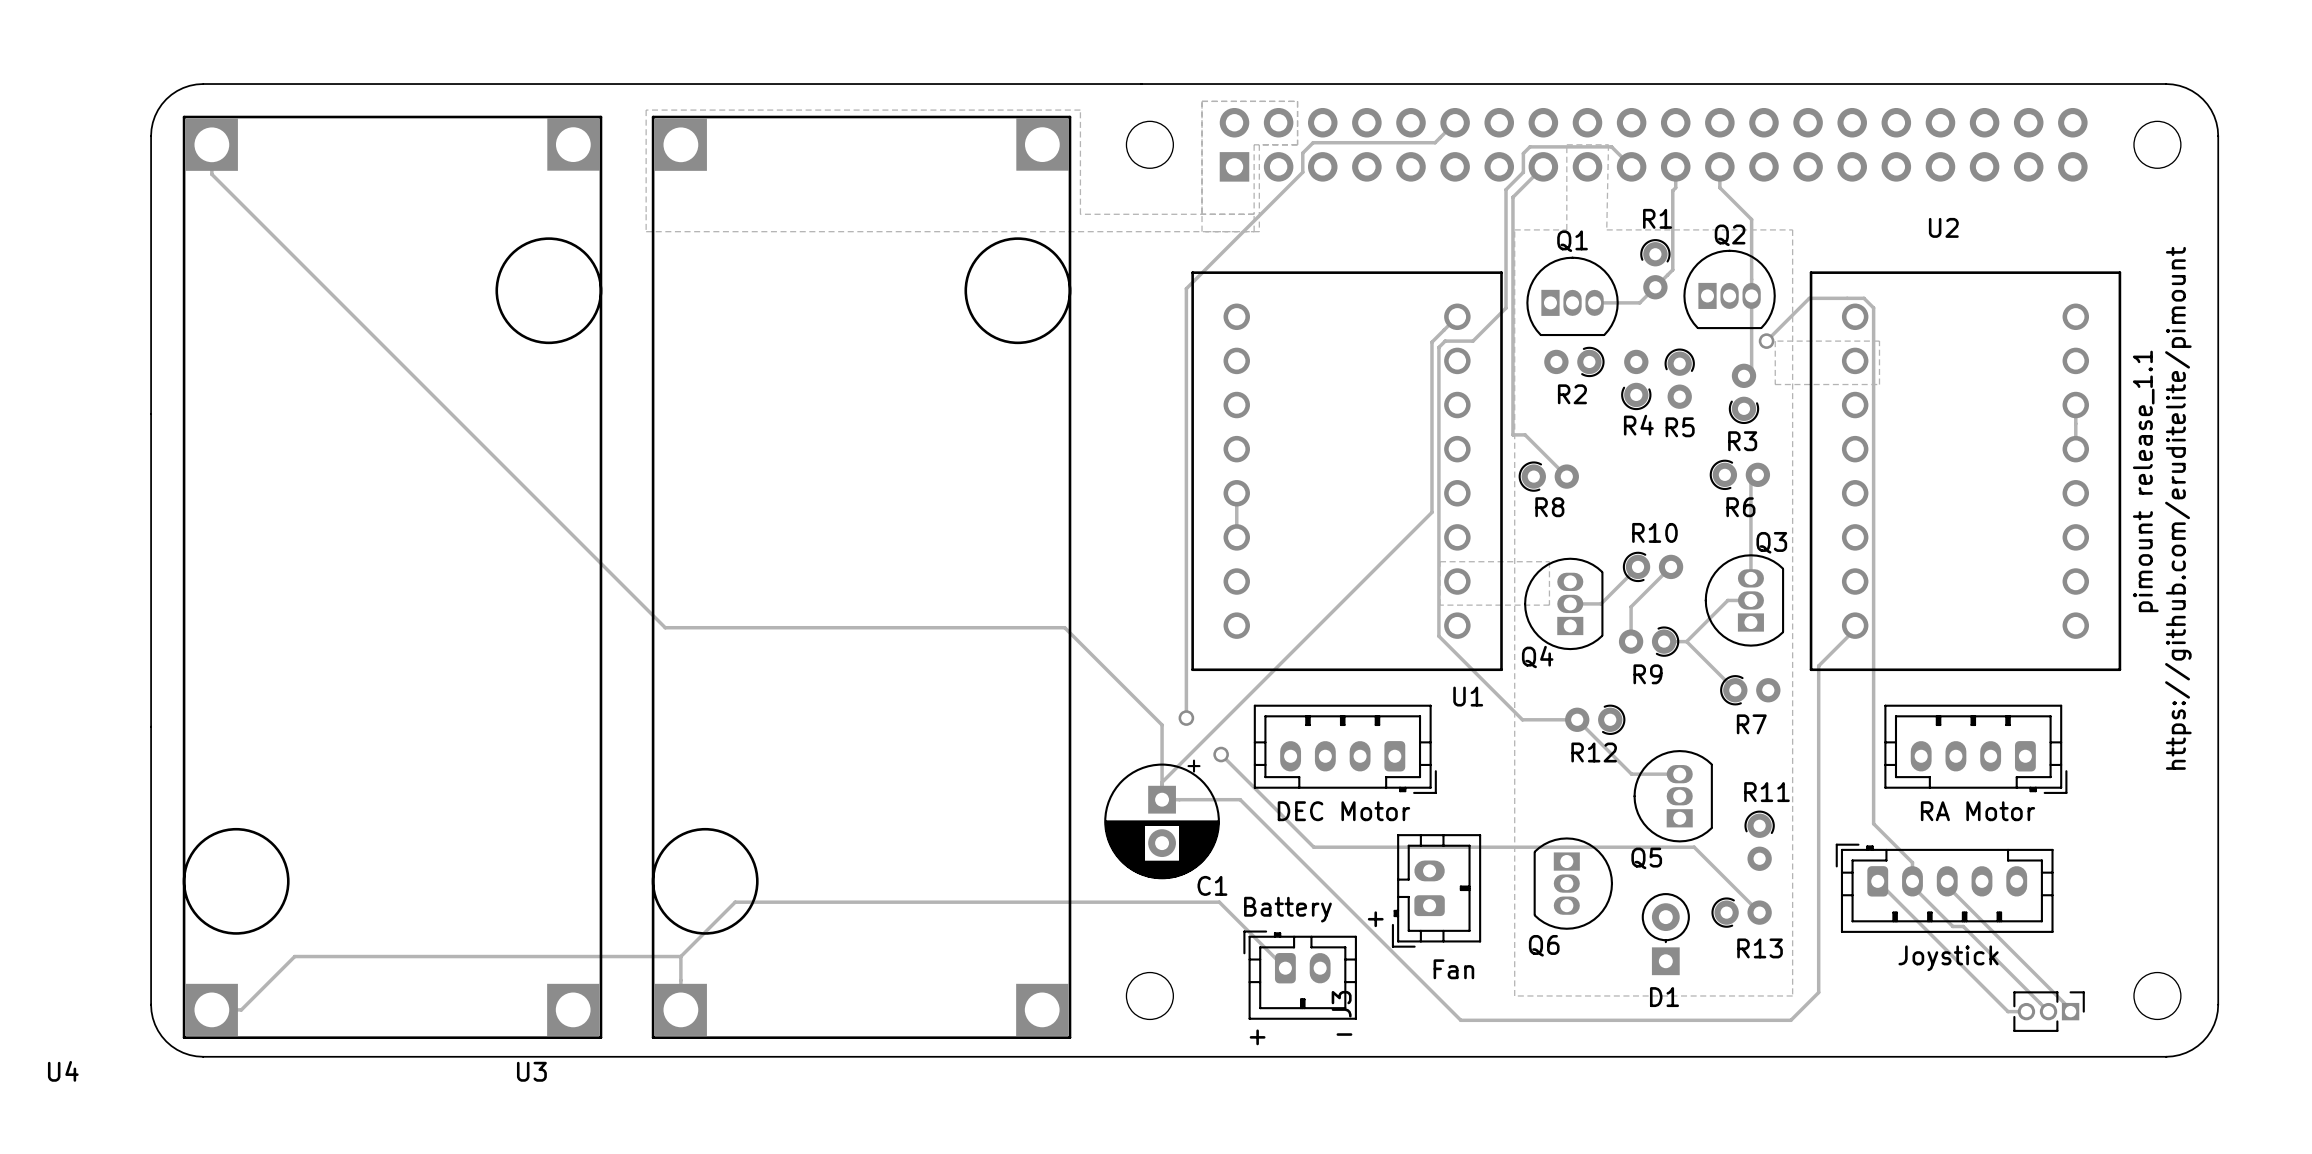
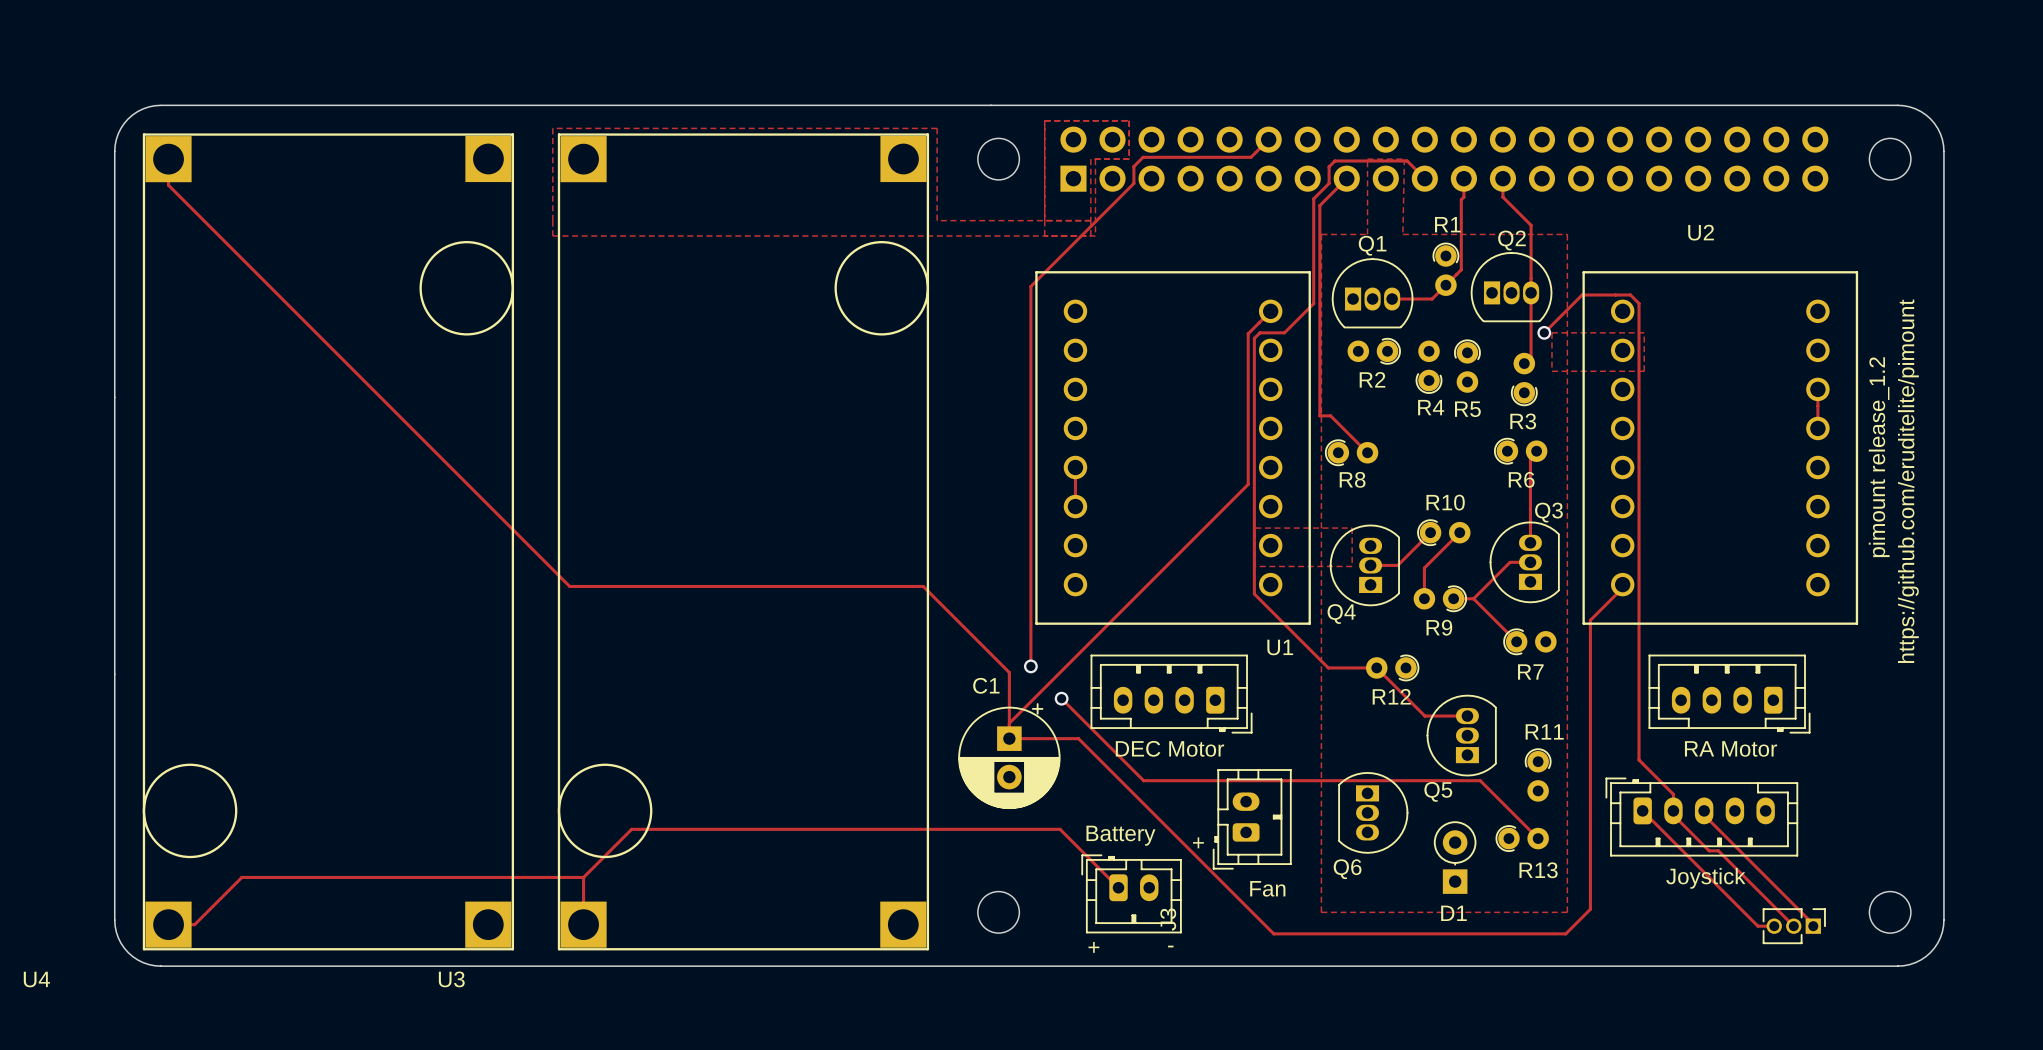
text: pimount release_1.1 (2145, 481) -> pimount release_1.2 (1879, 457)
C1 name position: C1 (1212, 885) -> C1 (986, 685)

